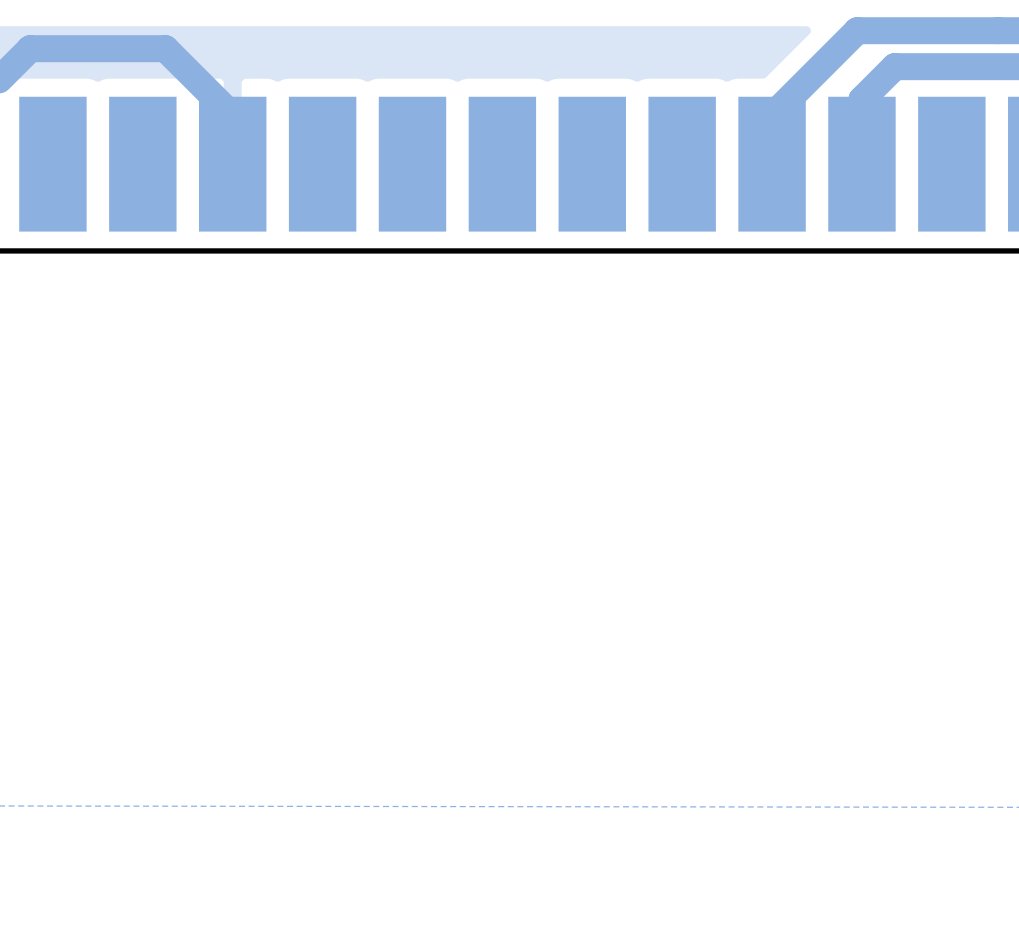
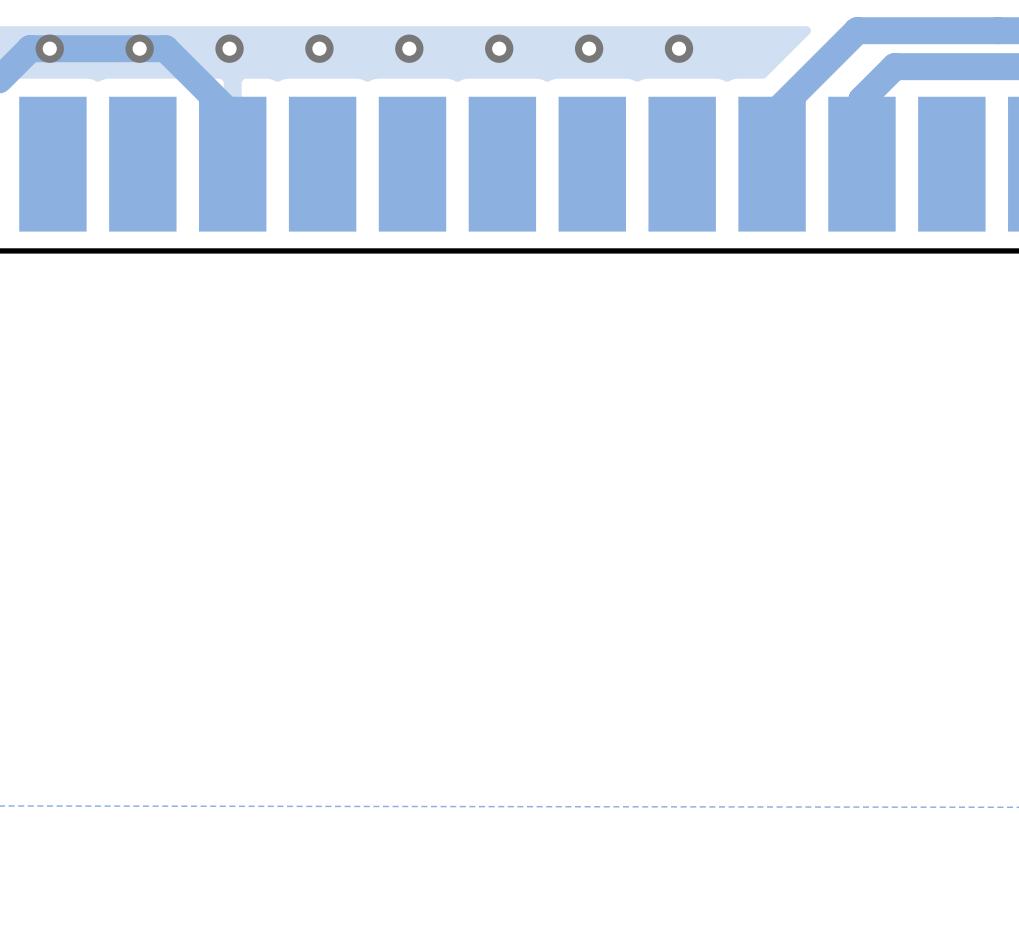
via: none -> (49, 48)
via: none -> (139, 48)
via: none -> (229, 48)
via: none -> (319, 48)
via: none -> (409, 48)
via: none -> (499, 48)
via: none -> (589, 48)
via: none -> (679, 48)

